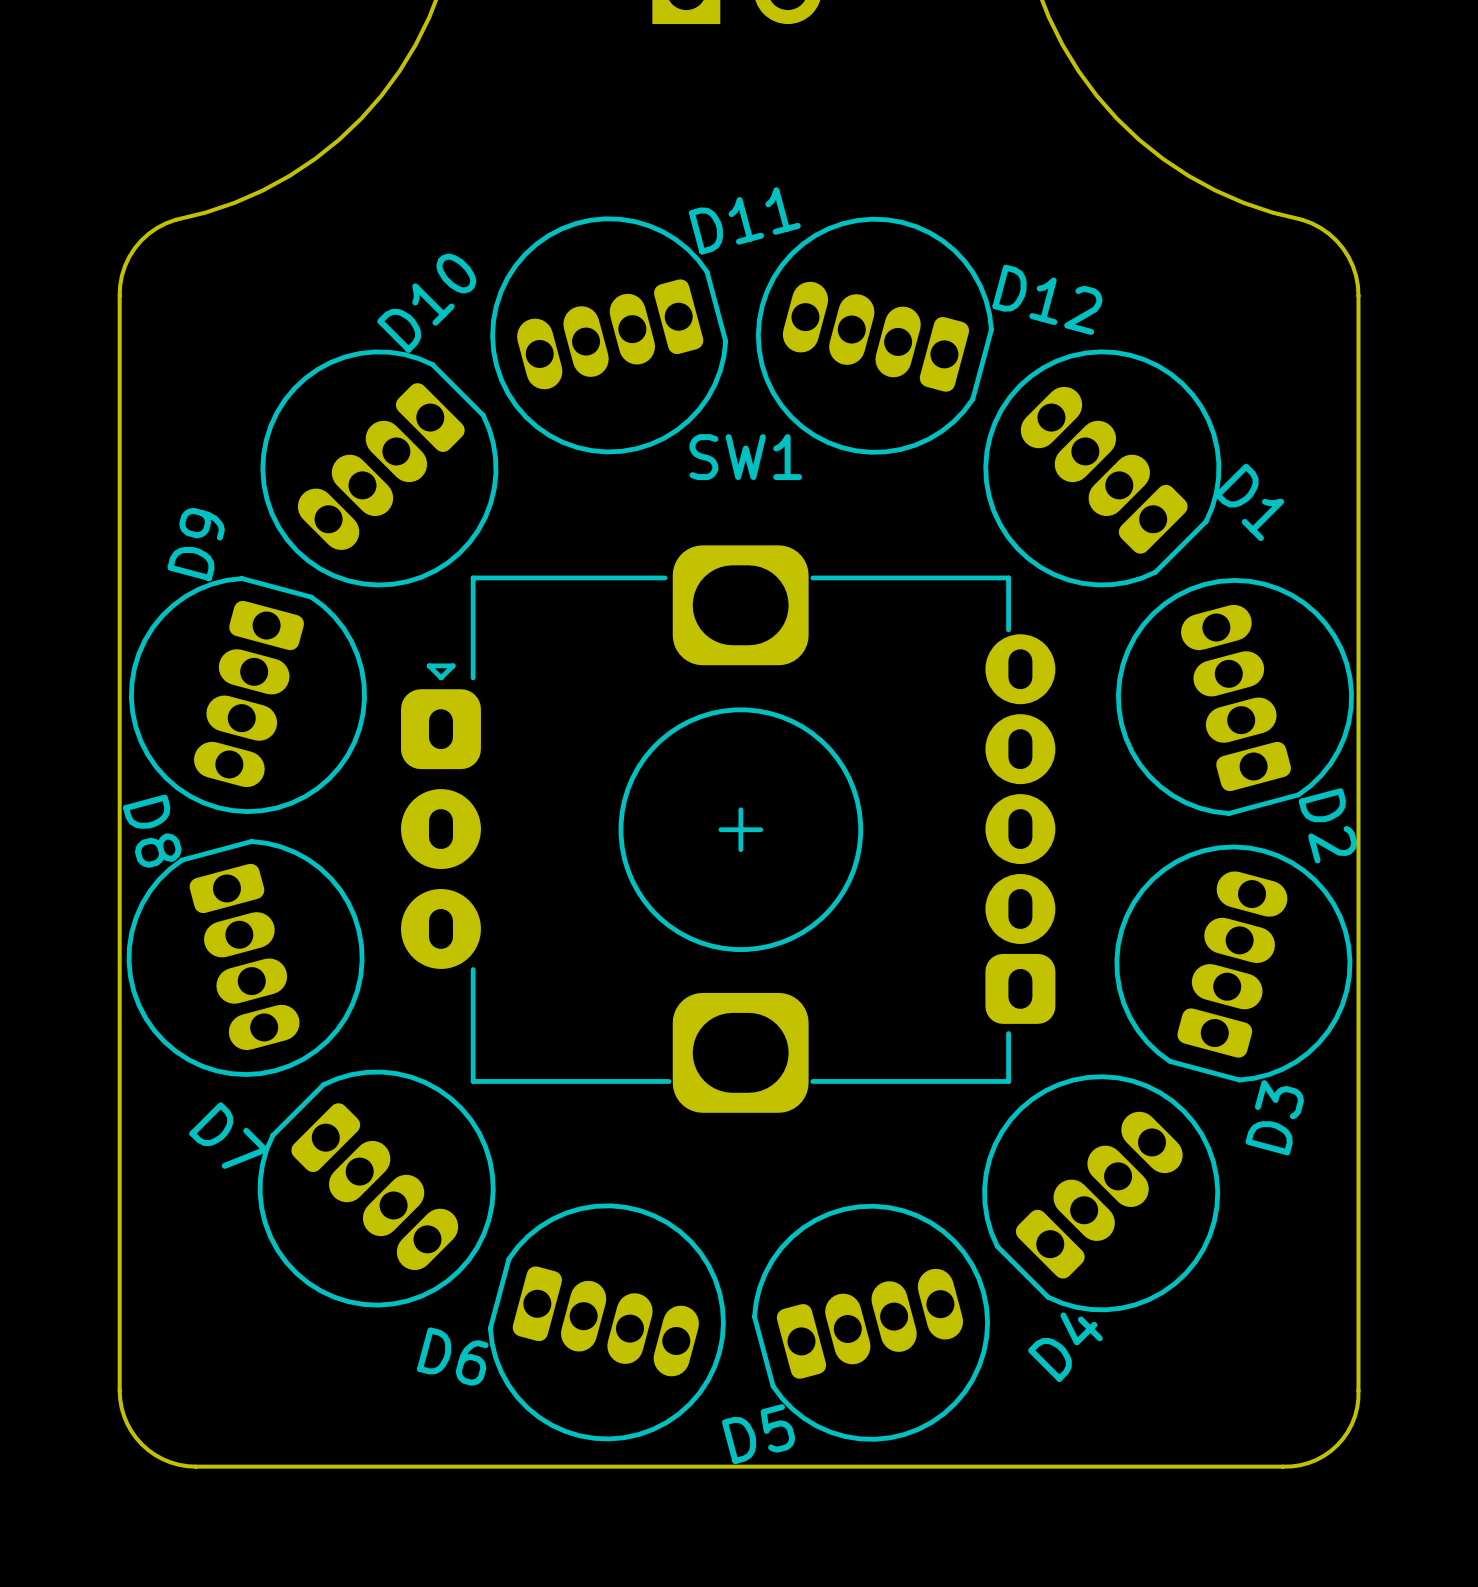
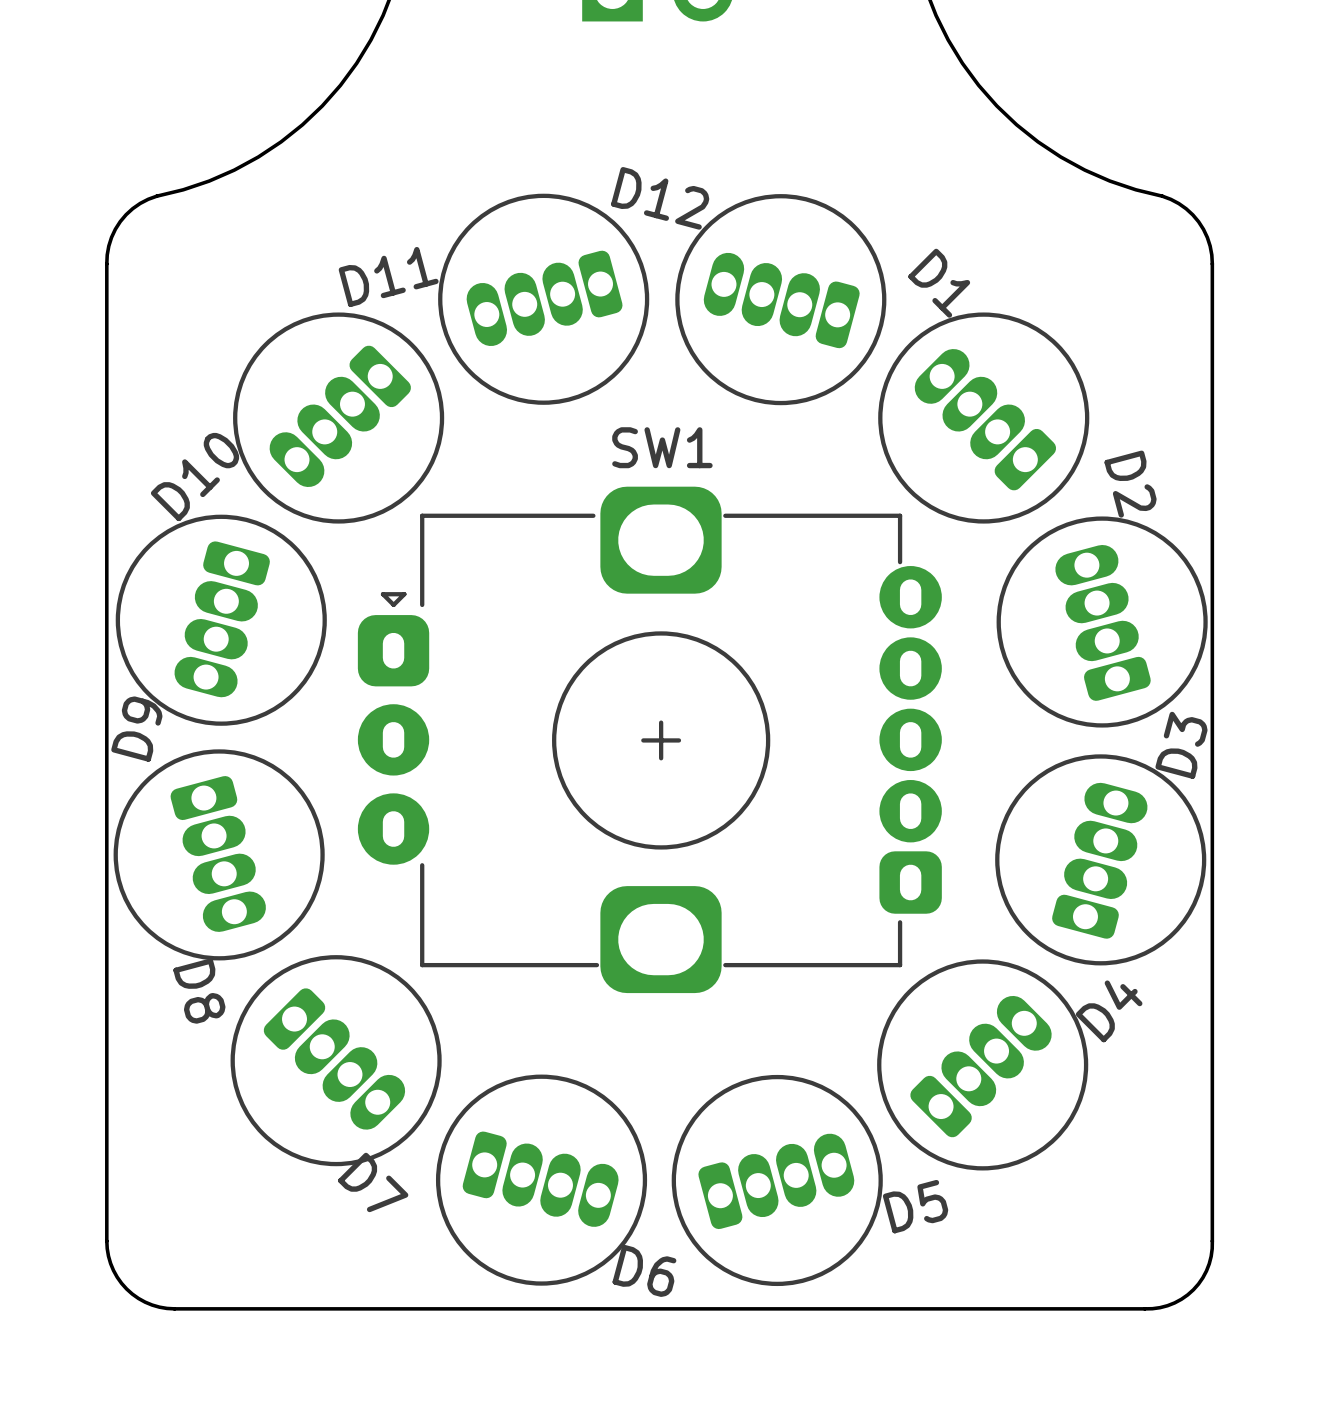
D11 footprint: [490, 216, 729, 455] -> [438, 193, 650, 405]
D12 footprint: [755, 216, 994, 455] -> [675, 194, 887, 406]
D11 name position: D11 (744, 220) -> D11 (388, 276)
D12 name position: D12 (1047, 299) -> D12 (660, 198)
D10 name position: D10 (426, 303) -> D10 (195, 477)
D10 footprint: [260, 349, 499, 588] -> [233, 312, 445, 524]
D1 footprint: [983, 349, 1222, 588] -> [878, 312, 1090, 524]
SW1 name position: SW1 (745, 457) -> SW1 (662, 447)
D1 name position: D1 (1249, 502) -> D1 (939, 283)
D9 name position: D9 (196, 544) -> D9 (136, 729)
D9 footprint: [128, 576, 367, 815] -> [115, 514, 327, 726]
D2 footprint: [1116, 577, 1354, 816] -> [996, 516, 1208, 728]
D2 name position: D2 (1328, 825) -> D2 (1130, 484)
D8 name position: D8 (152, 831) -> D8 (199, 991)
D8 footprint: [126, 839, 365, 1077] -> [113, 749, 325, 961]
D3 footprint: [1114, 844, 1353, 1083] -> [995, 754, 1207, 966]
D7 footprint: [257, 1069, 496, 1308] -> [230, 955, 442, 1167]
D4 footprint: [982, 1074, 1221, 1313] -> [877, 959, 1089, 1171]
D3 name position: D3 (1274, 1117) -> D3 (1181, 745)
D7 name position: D7 (228, 1135) -> D7 (373, 1182)
D6 footprint: [487, 1203, 726, 1442] -> [435, 1074, 648, 1286]
D5 footprint: [752, 1203, 990, 1442] -> [671, 1074, 883, 1287]
D4 name position: D4 (1065, 1347) -> D4 (1109, 1011)
D6 name position: D6 (452, 1356) -> D6 (644, 1270)
D5 name position: D5 (758, 1434) -> D5 (915, 1206)

